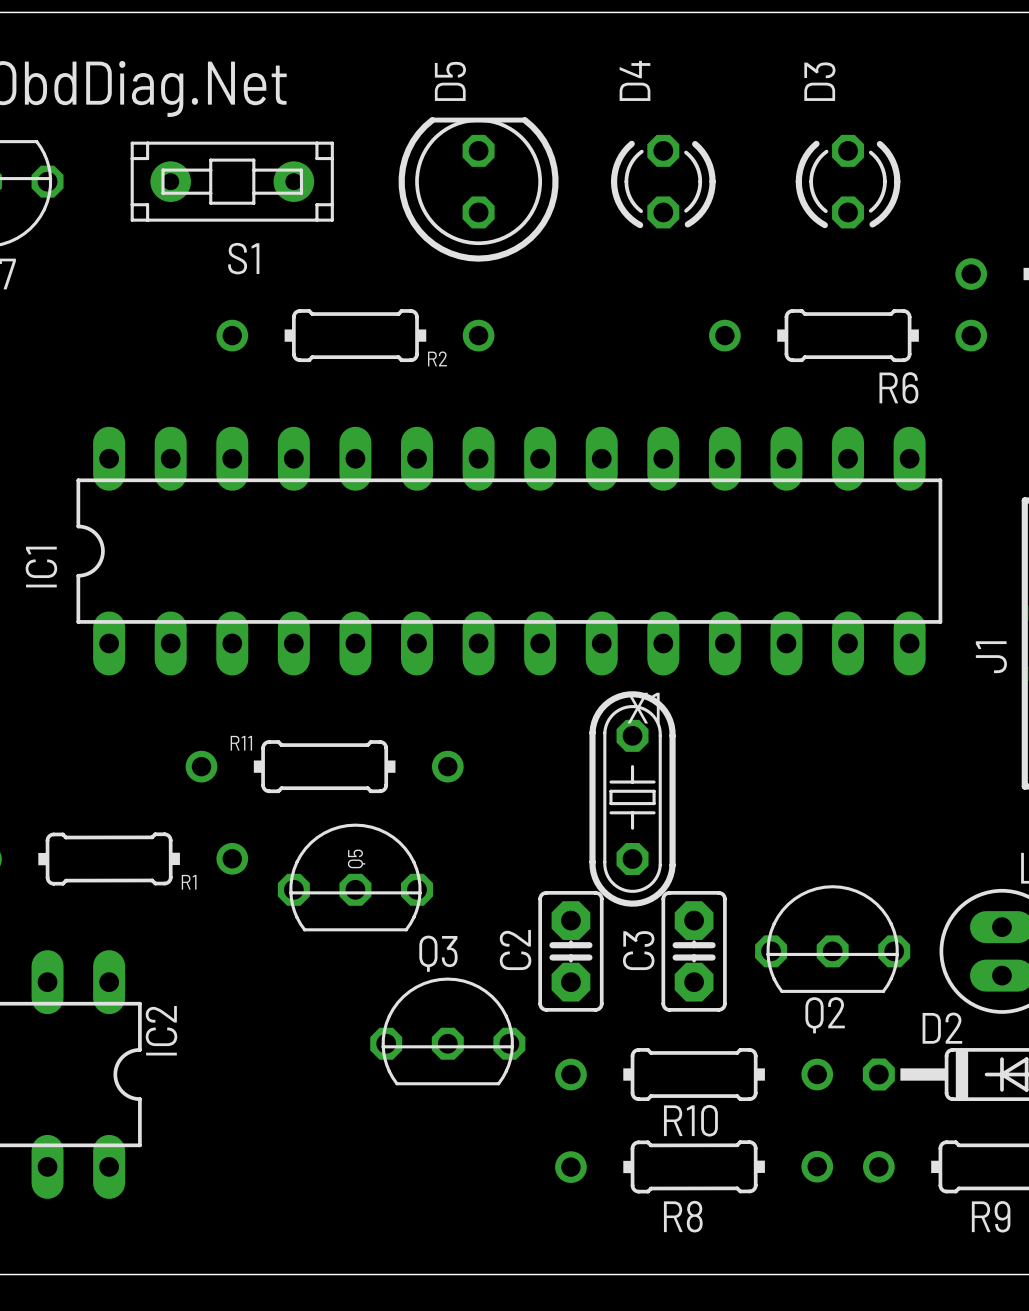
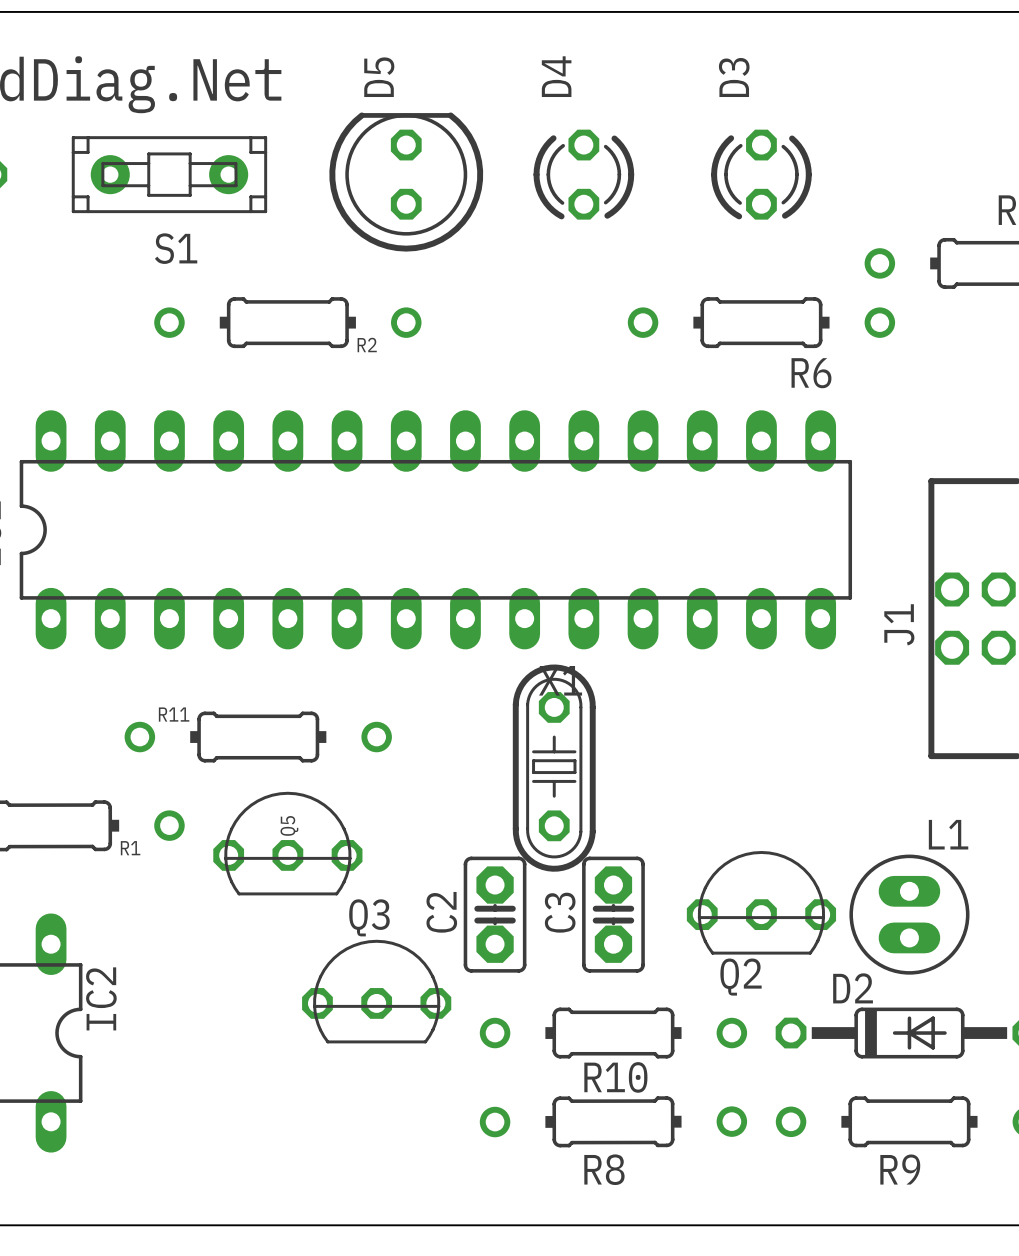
Q2 footprint: [755, 885, 911, 993] -> [686, 850, 837, 955]

